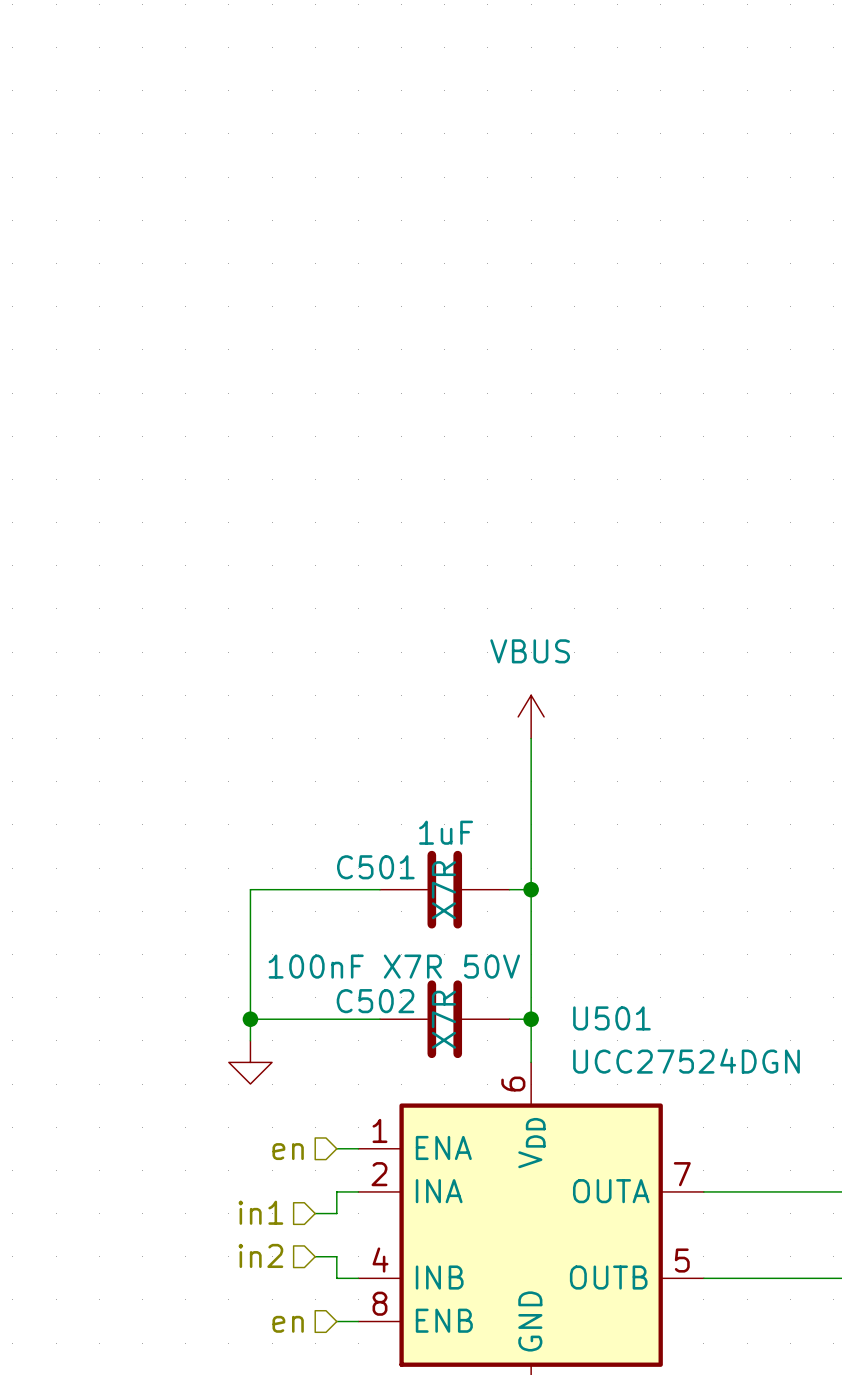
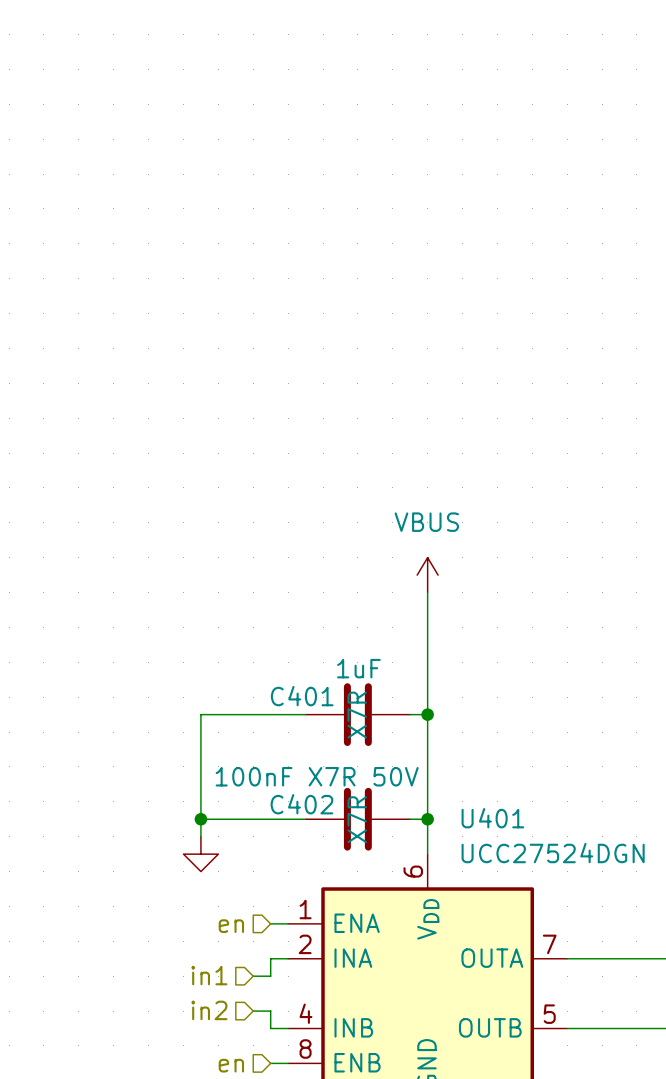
C501 name: C501 (375, 867) -> C401 (302, 696)
C502 name: C502 (375, 1001) -> C402 (301, 804)
U501 name: U501 (611, 1018) -> U401 (492, 818)

